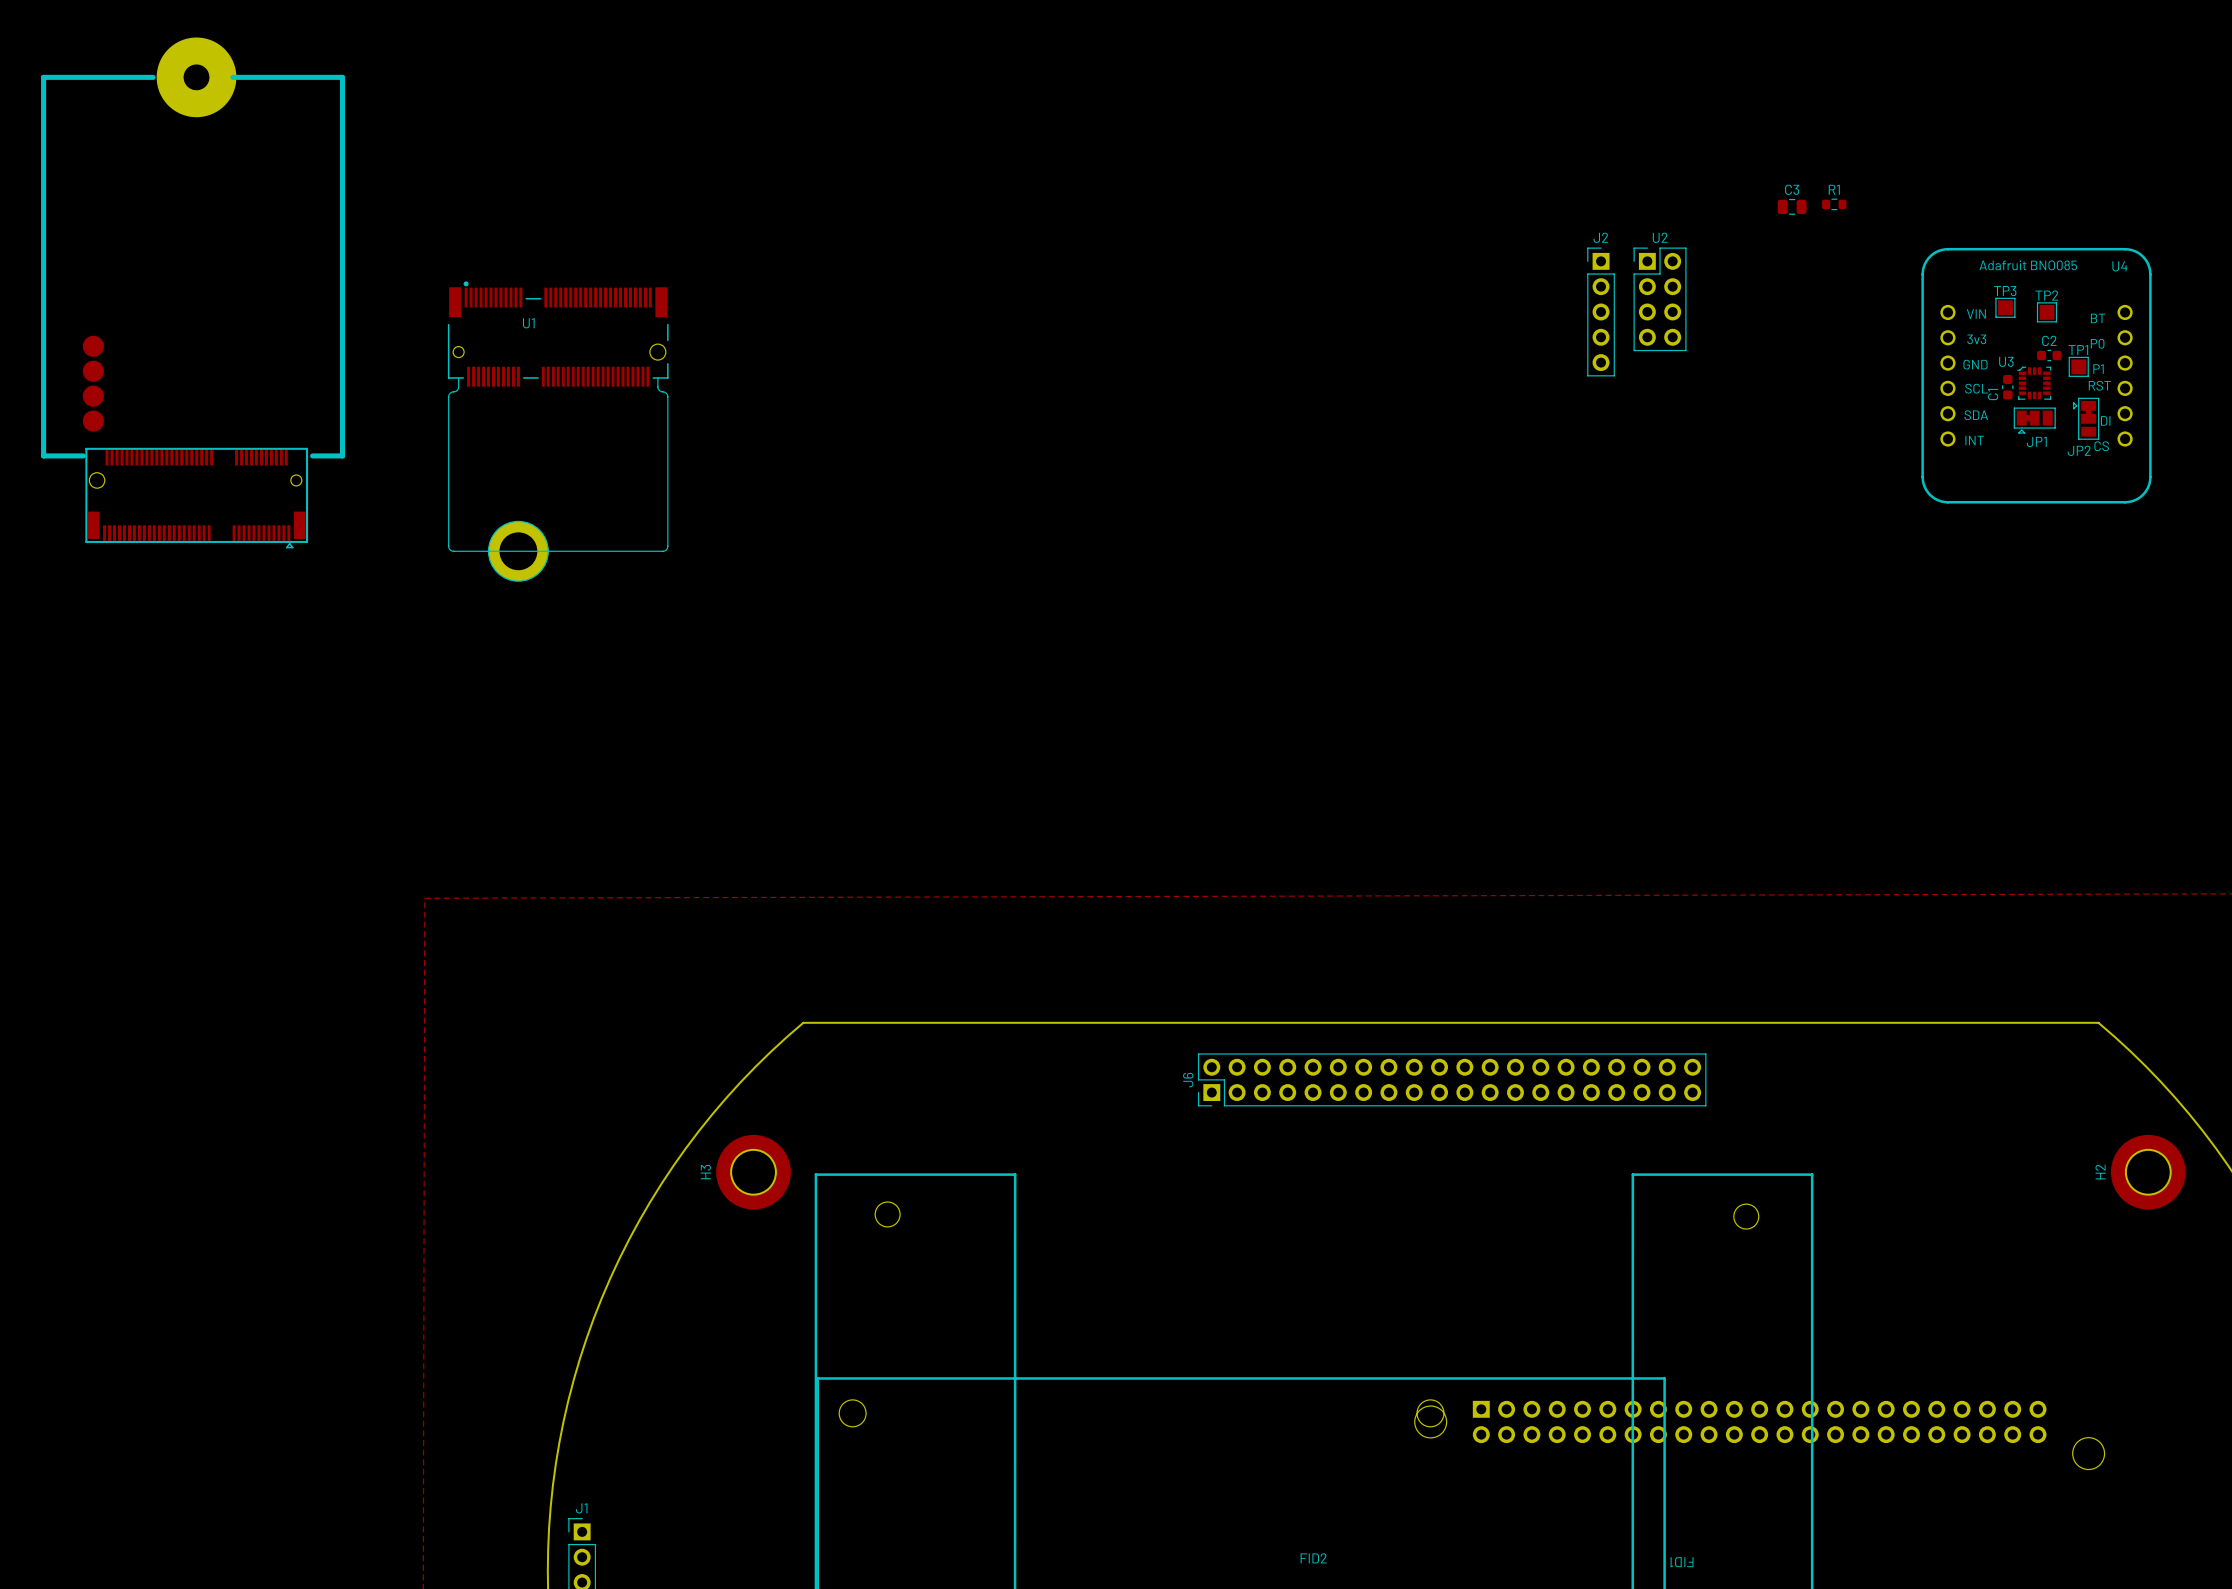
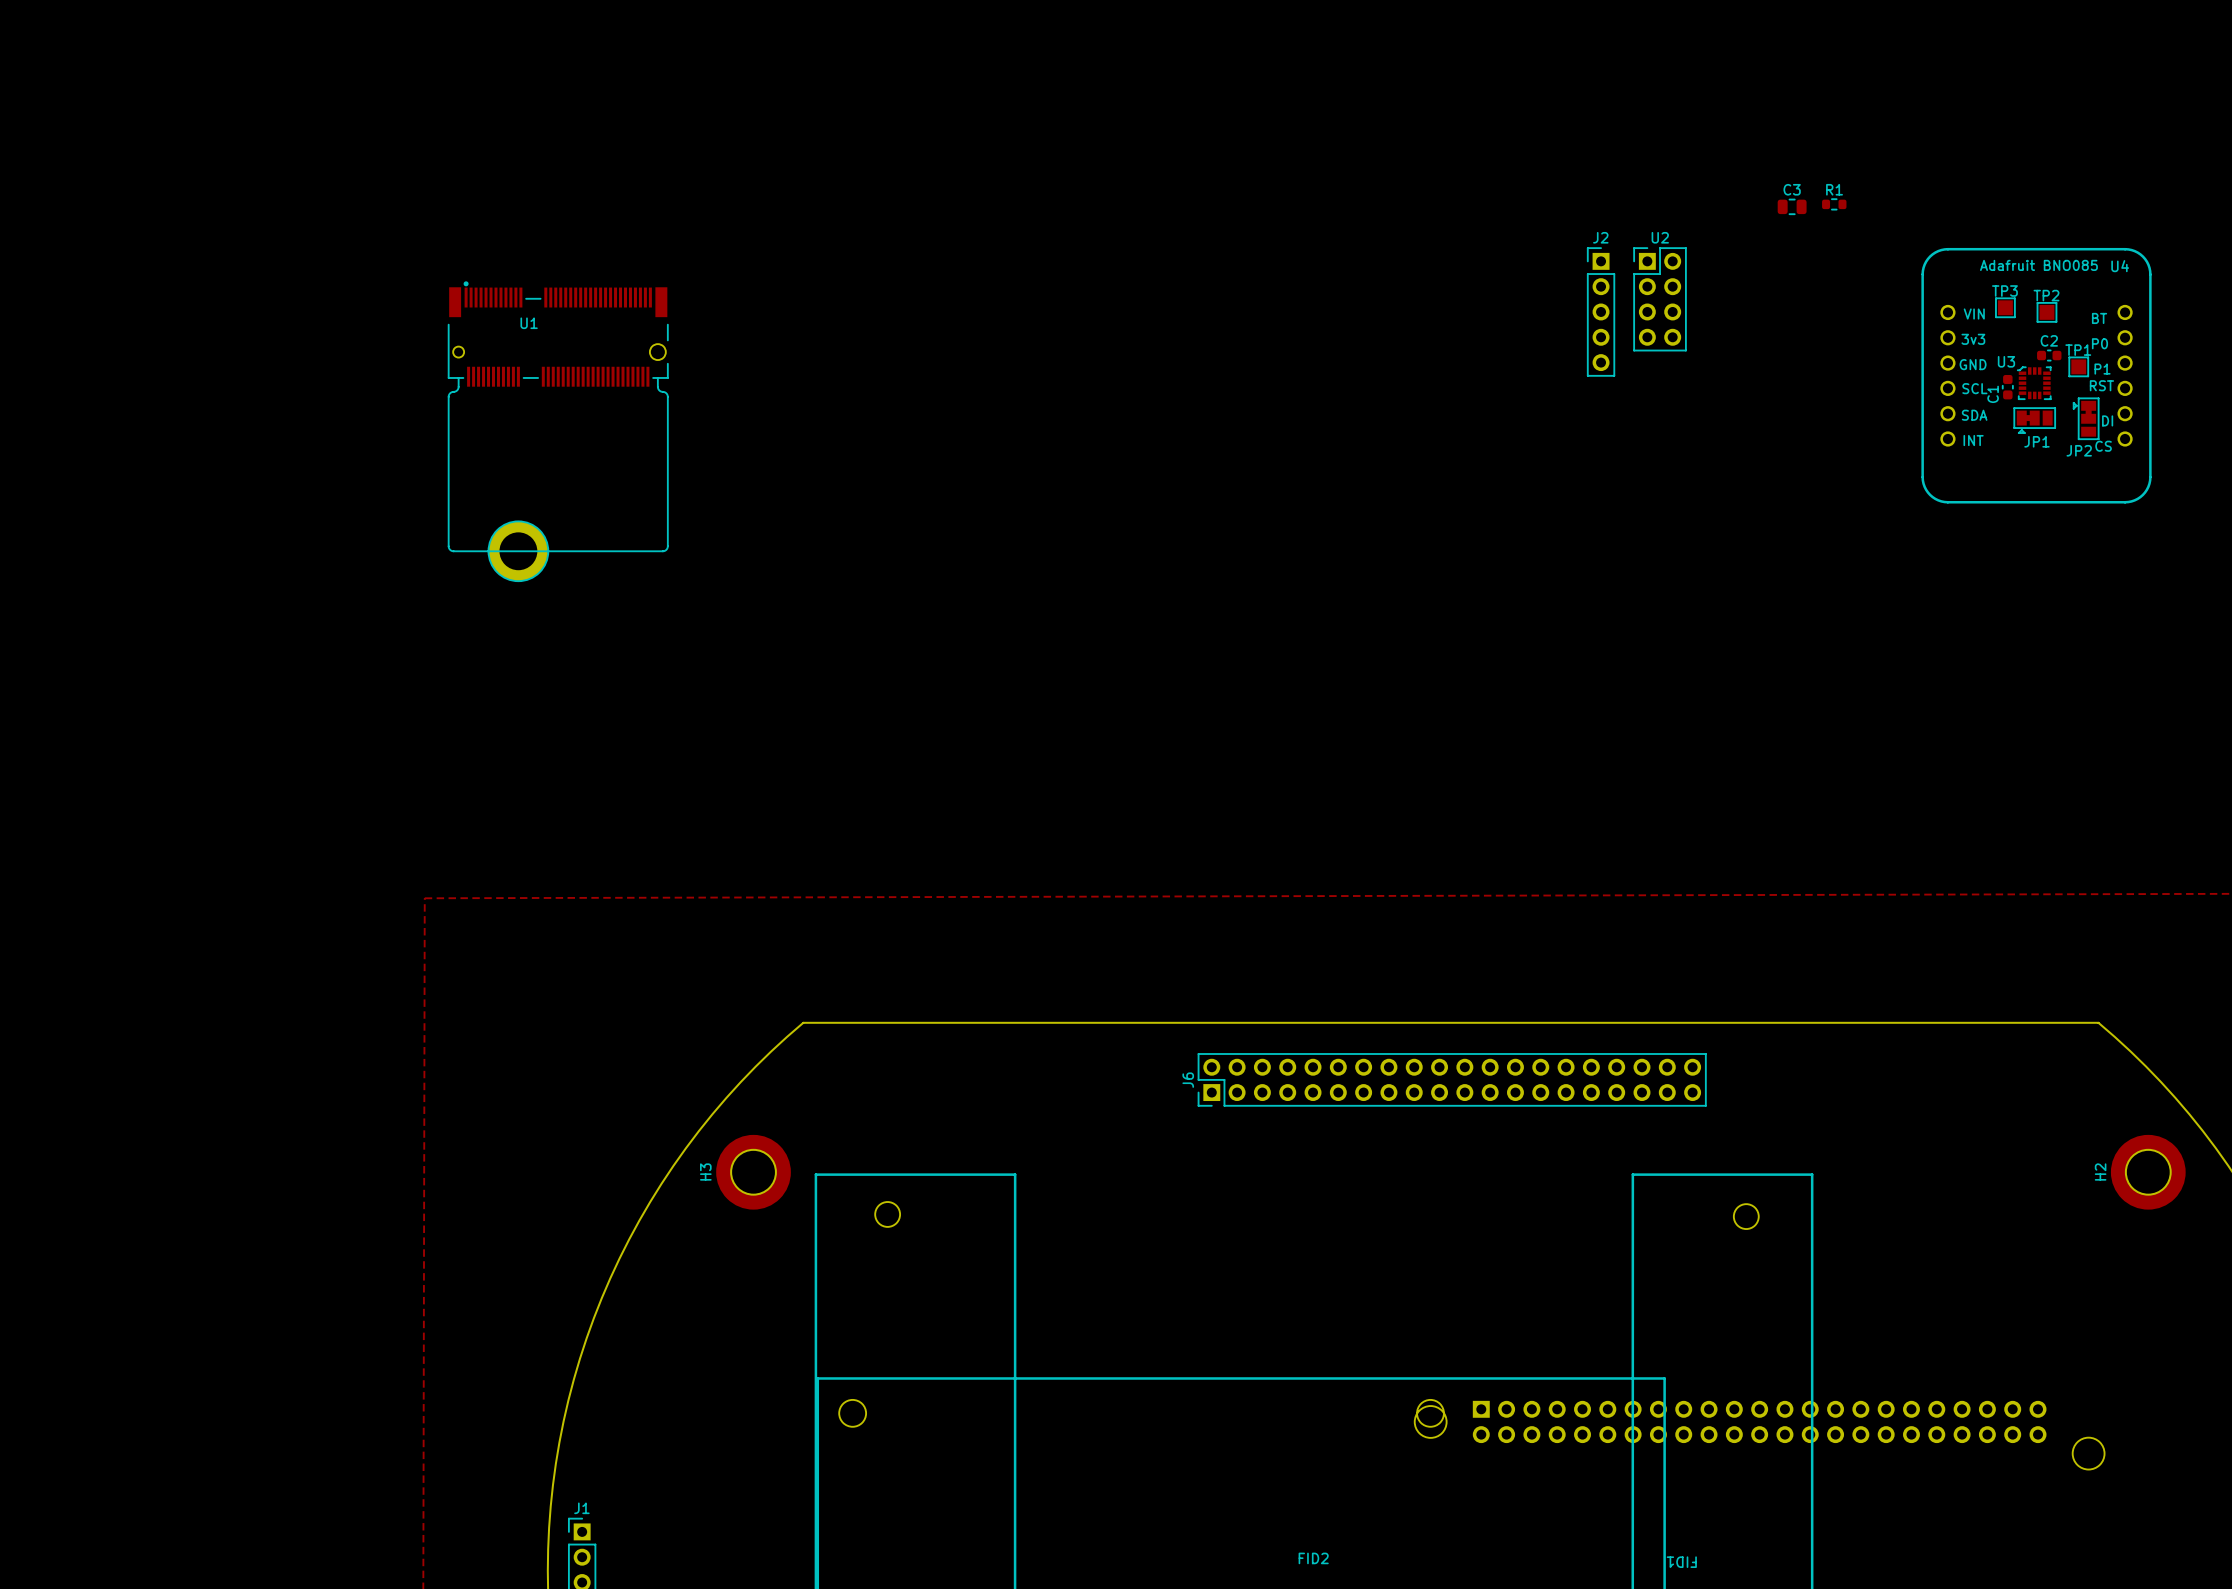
part: (193, 292) -> none

